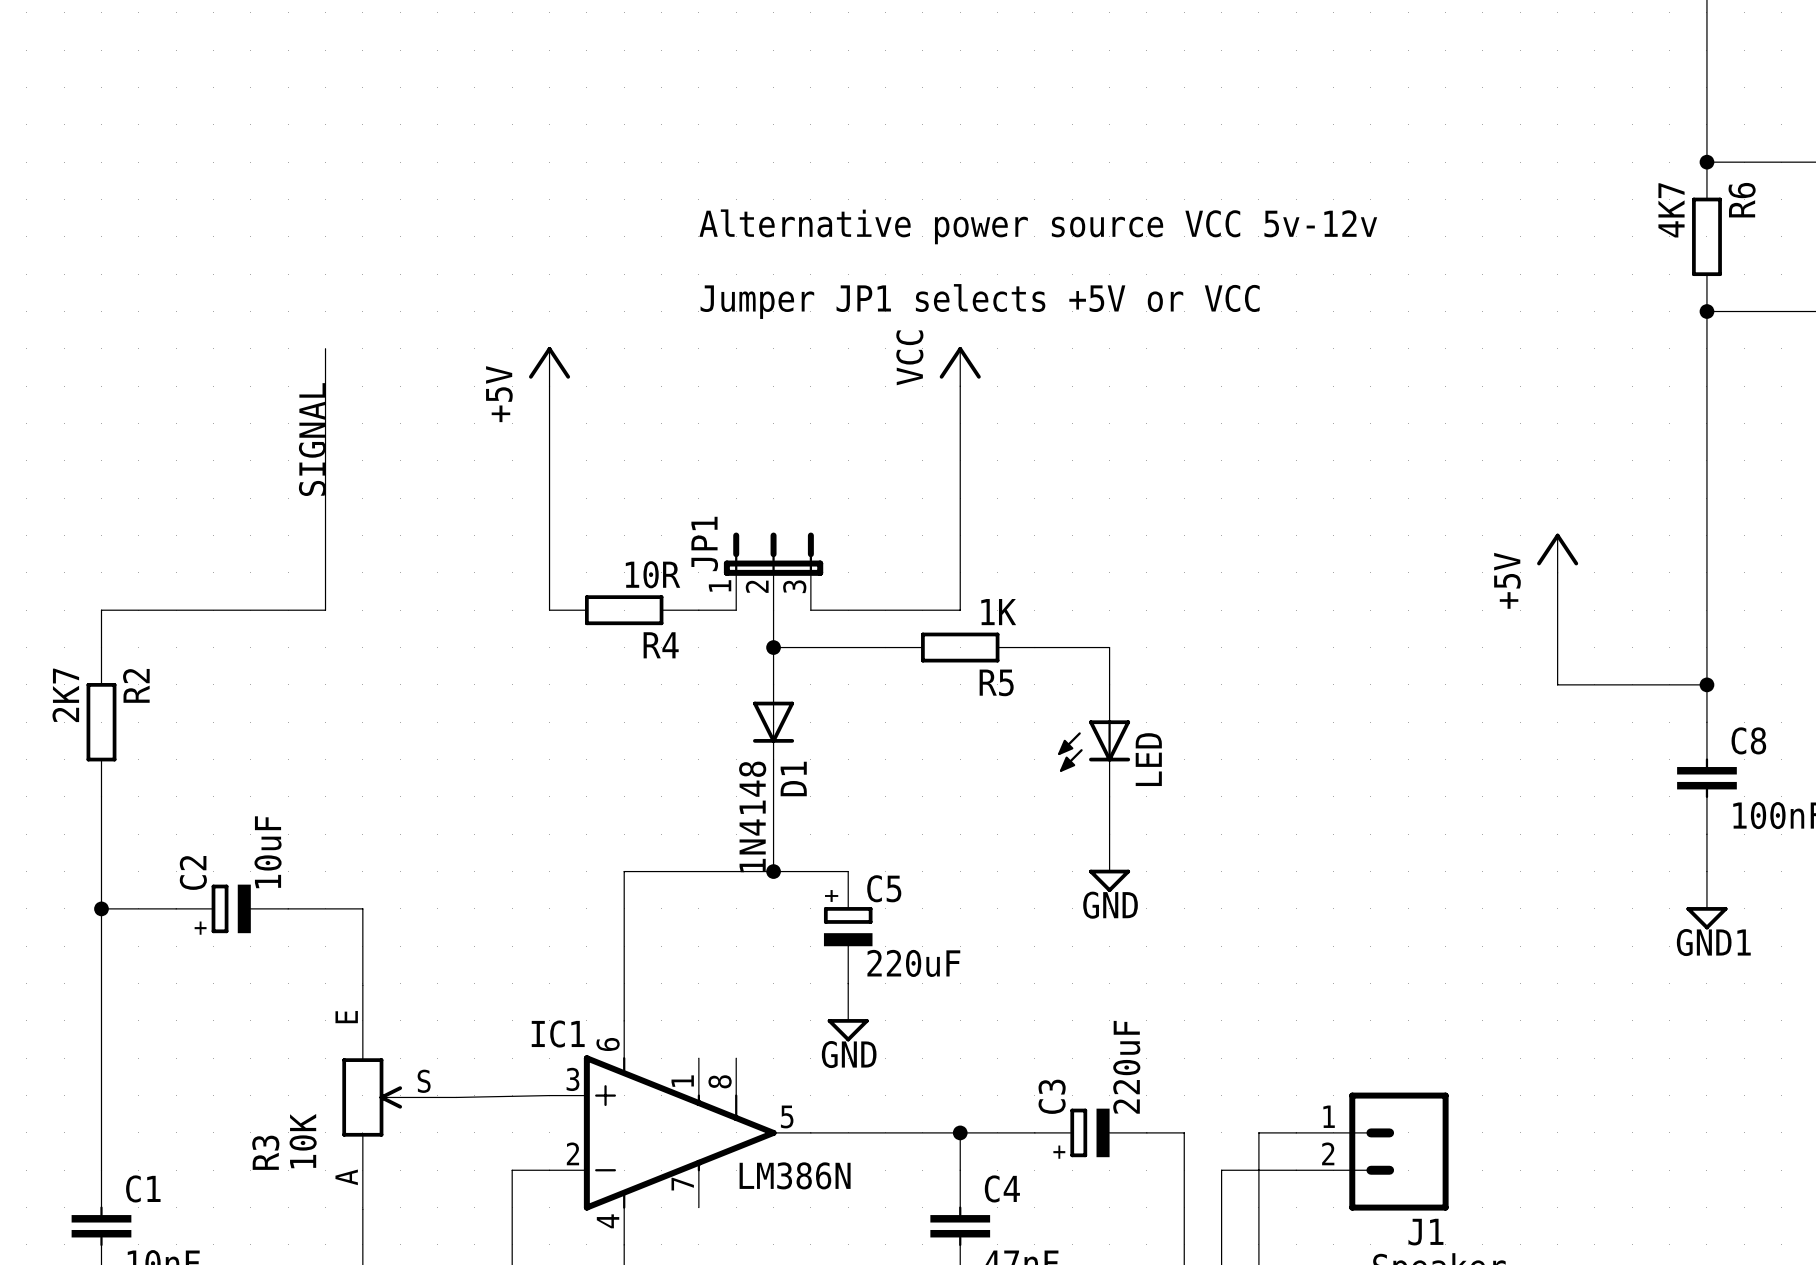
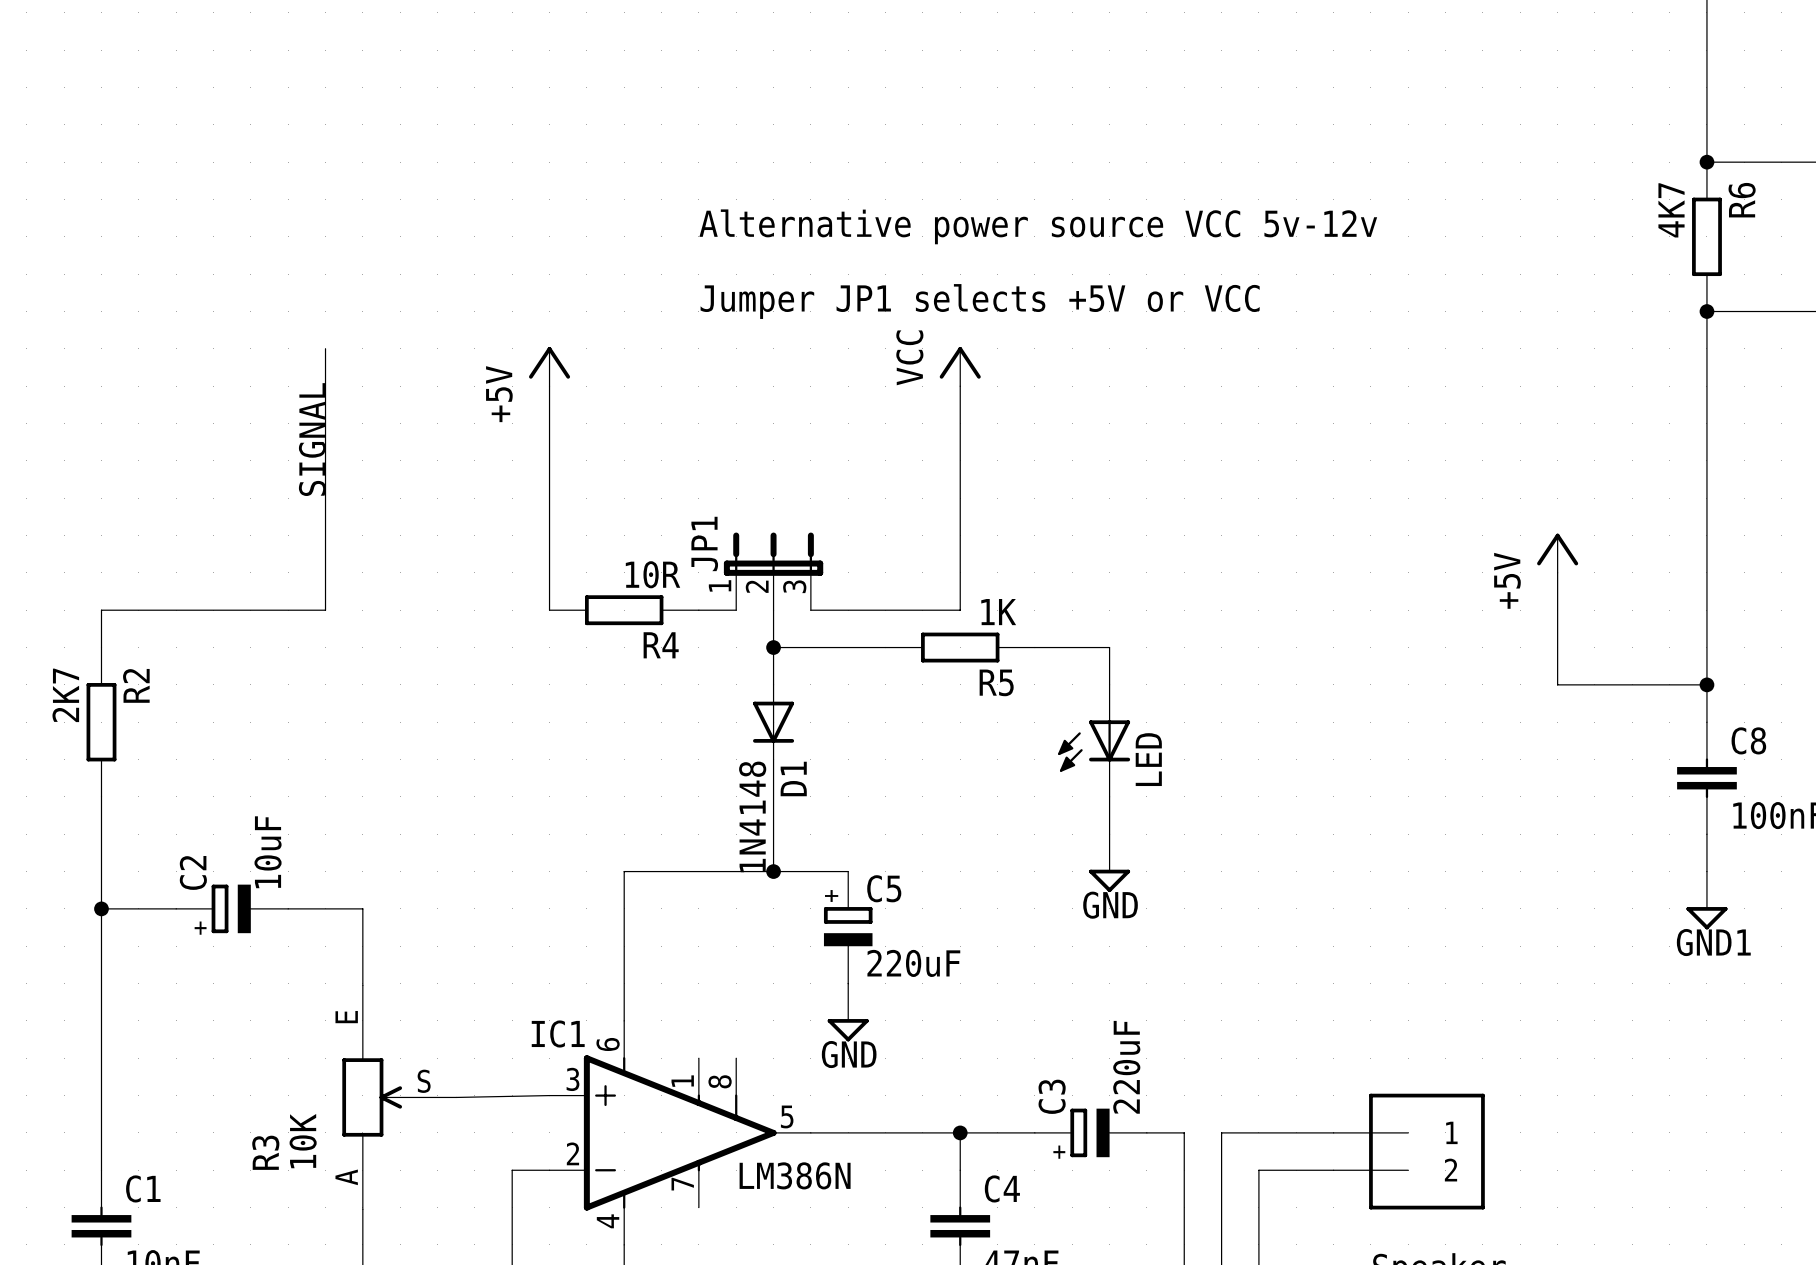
wire: (1258, 1132) (1258, 1170) (1221, 1170) -> (1258, 1132) (1221, 1132) (1221, 1170)
J1: (1372, 1151) -> none
part: none -> (1409, 1151)

